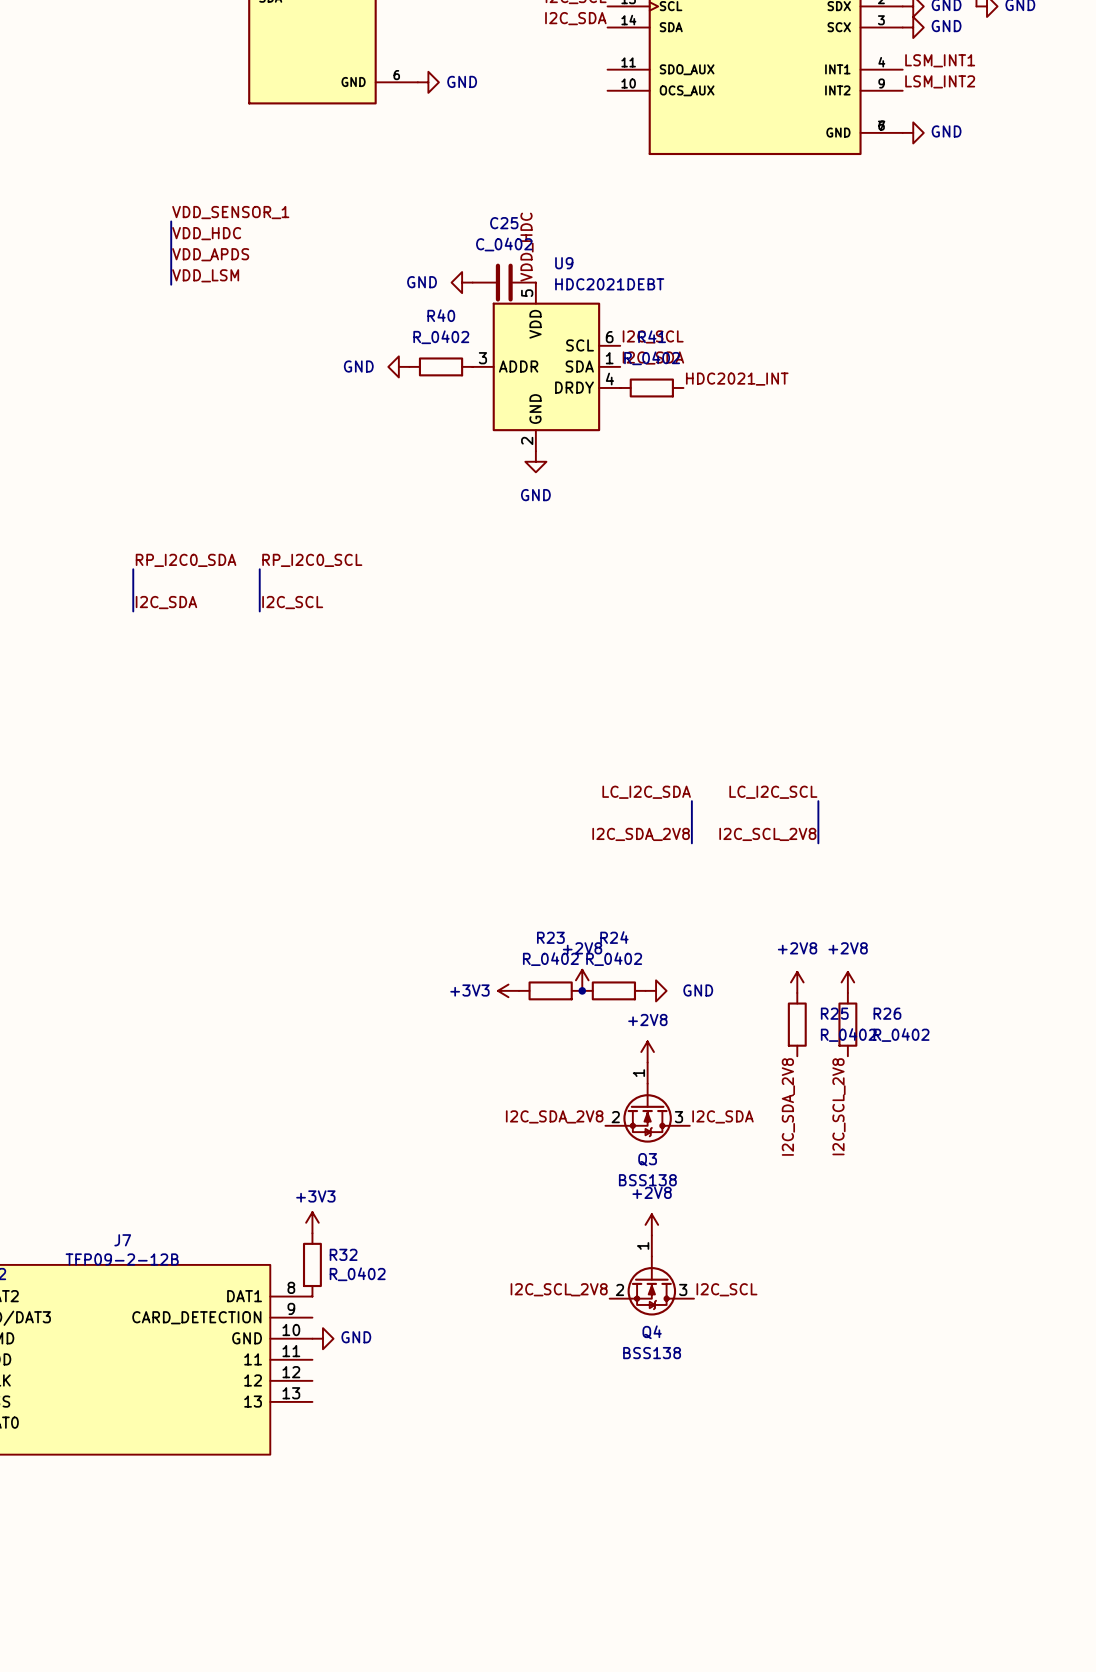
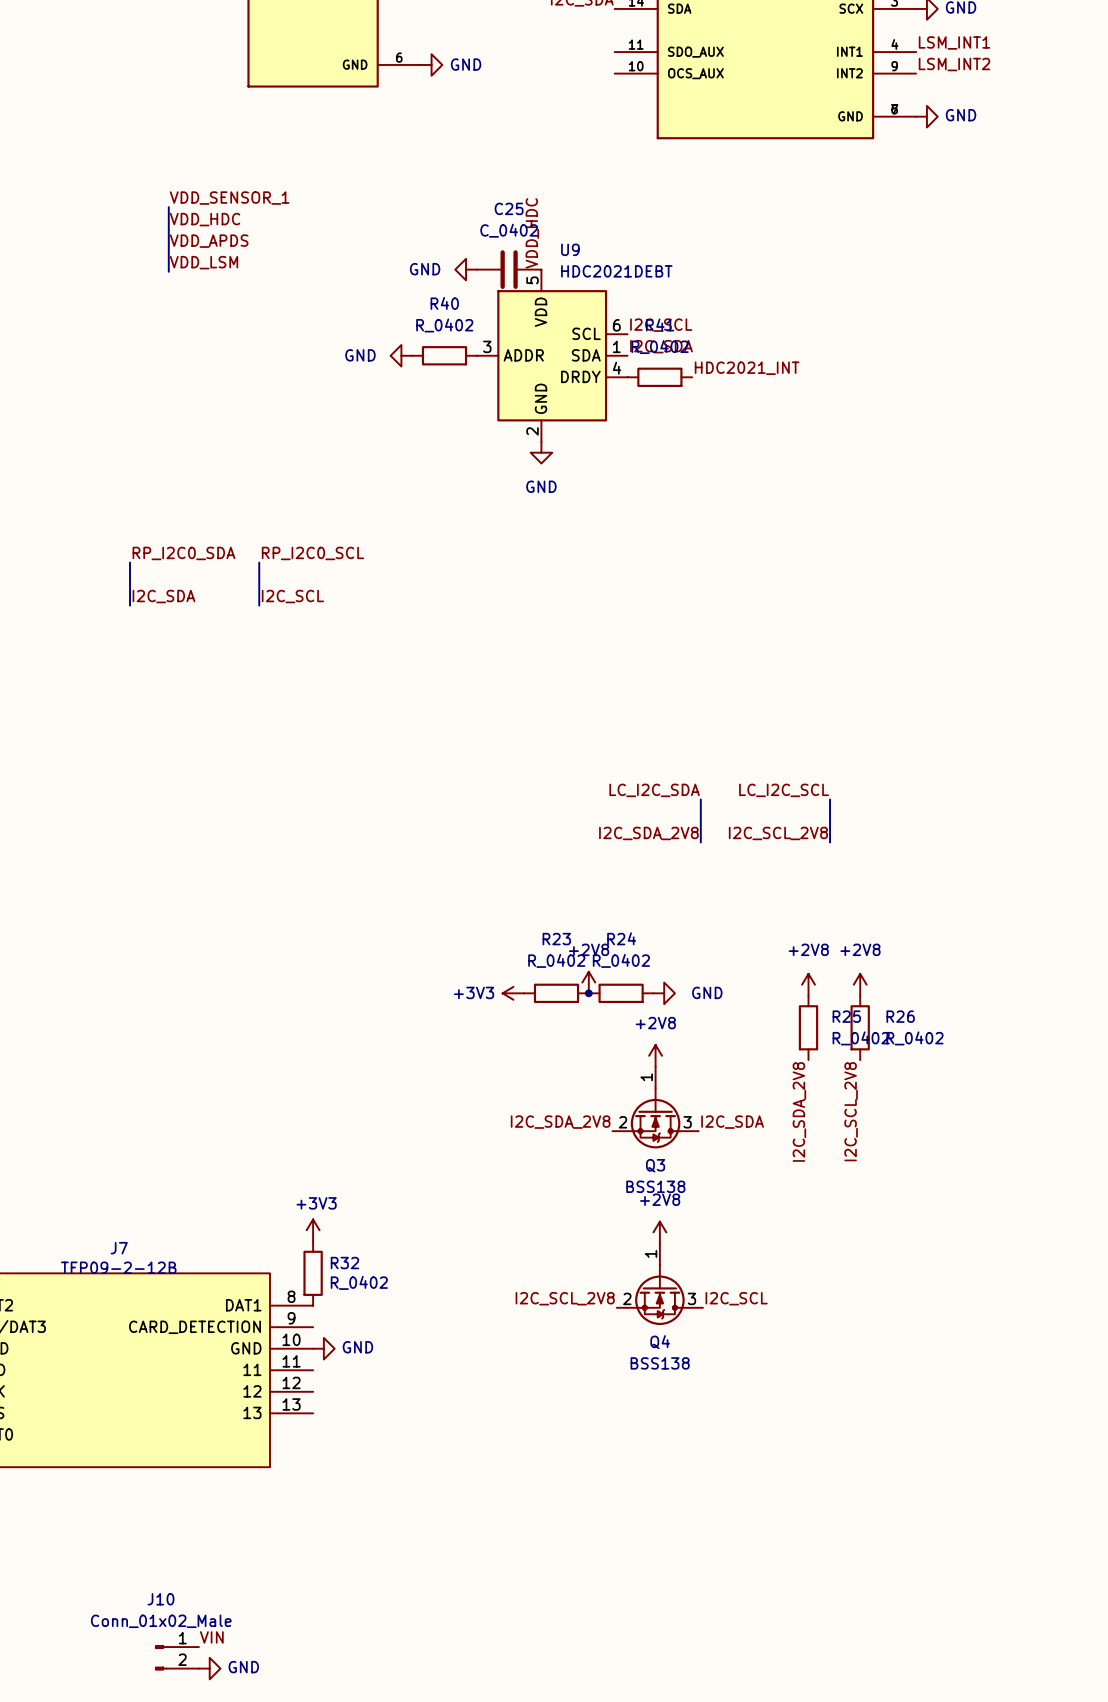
label: none -> VIN (211, 1637)
J10: none -> Conn_01x02_Male (177, 1657)
power symbol: none -> GND (209, 1668)

